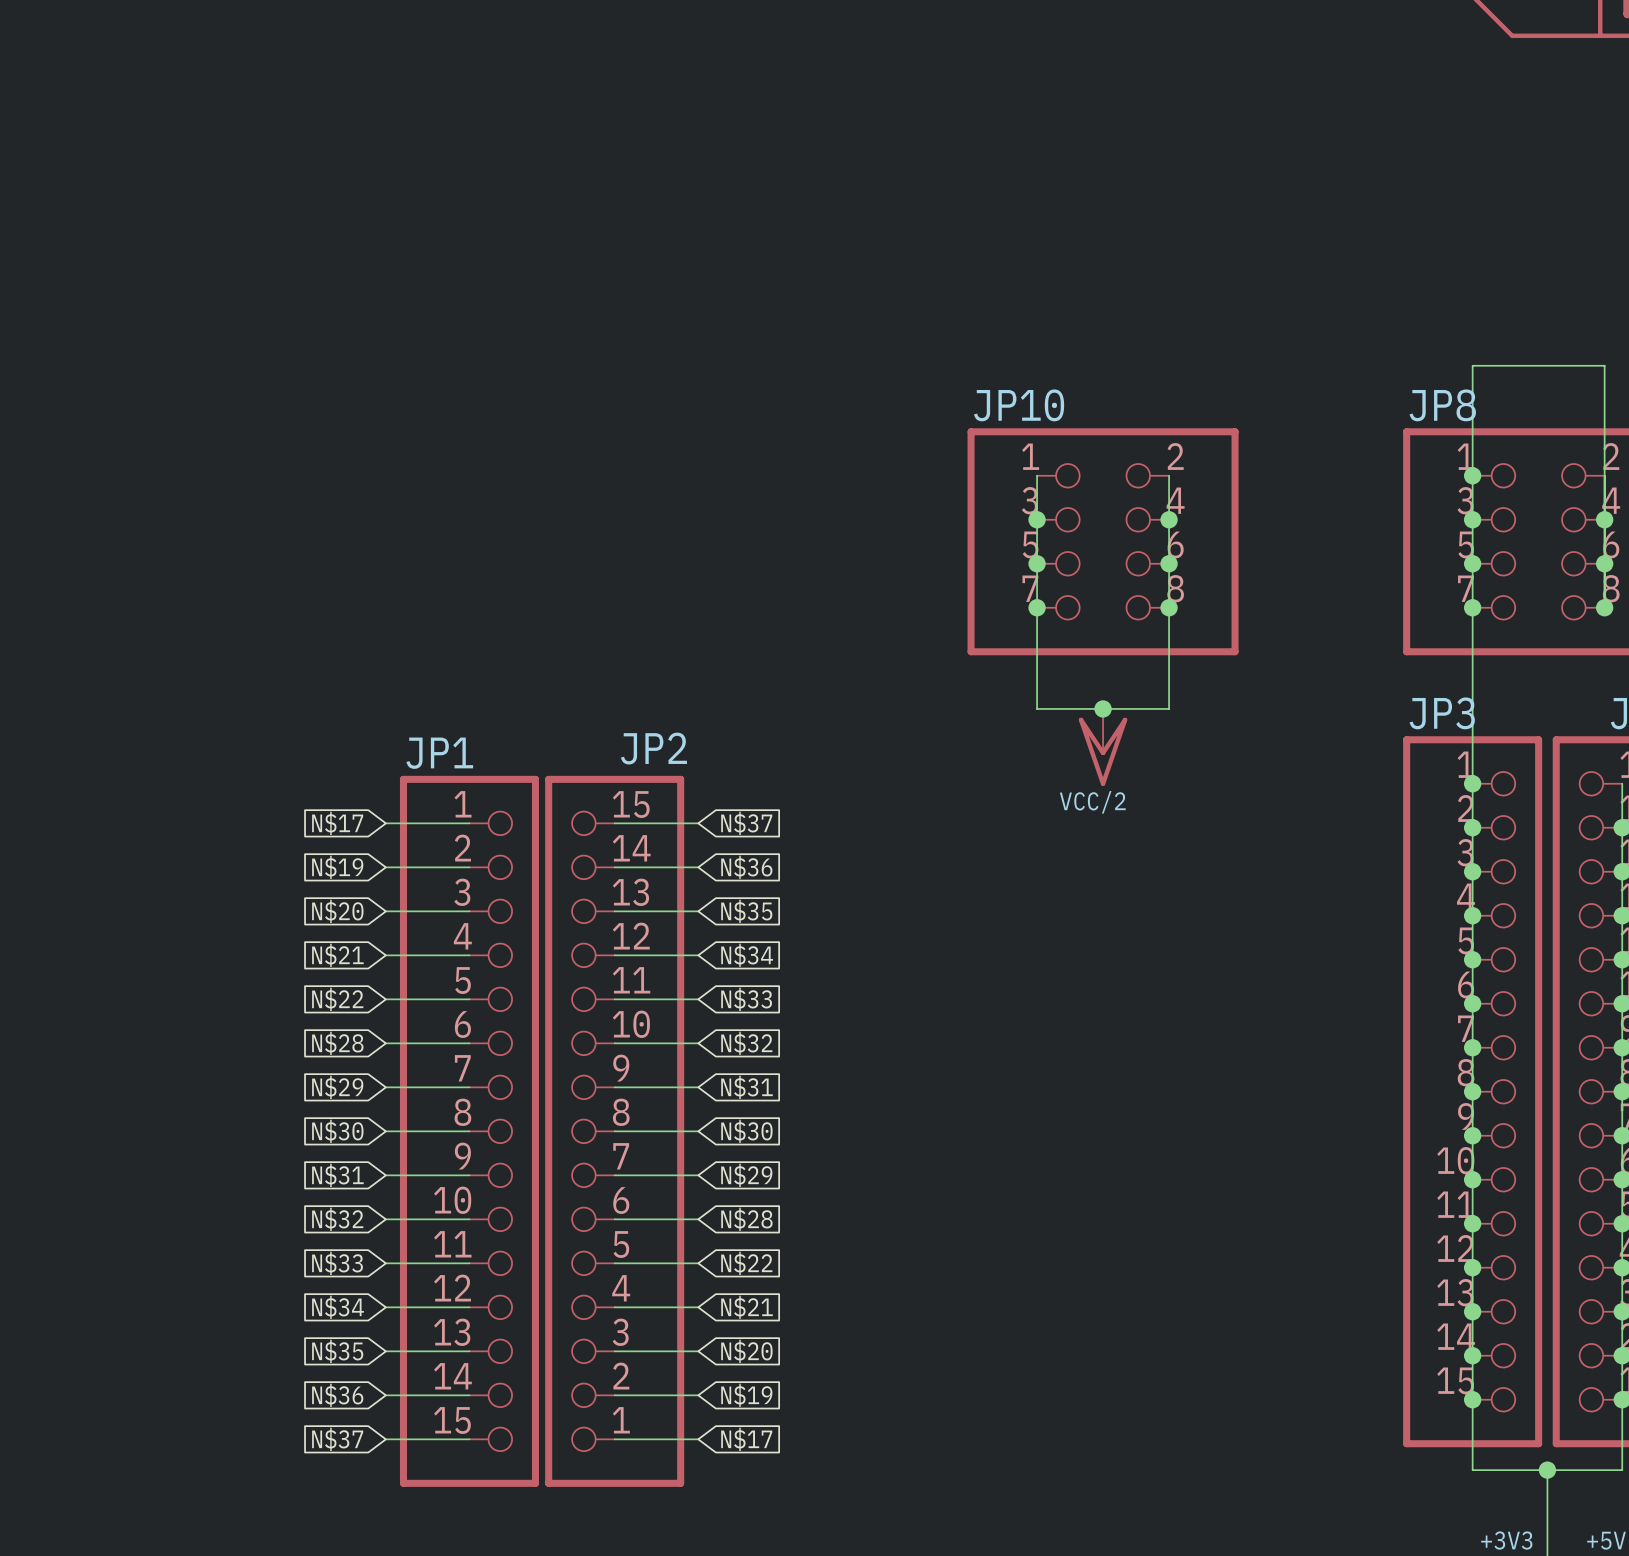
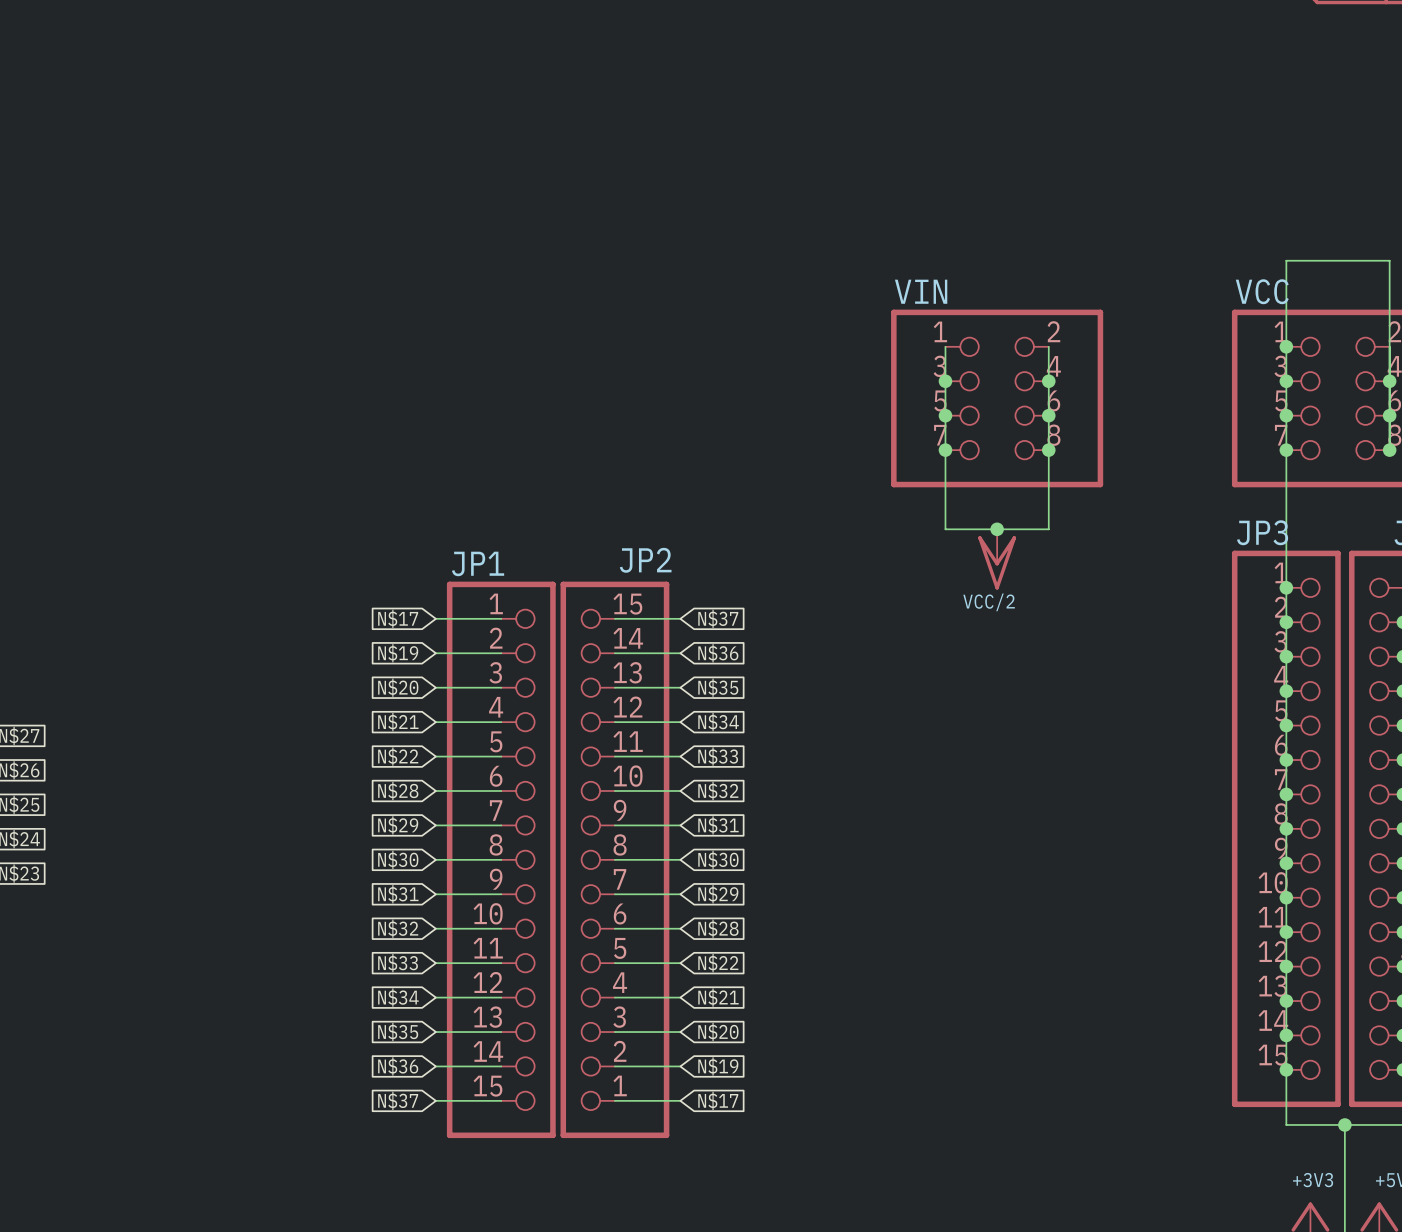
JP10 name: JP10 (1019, 405) -> VIN (921, 291)
JP8 name: JP8 (1442, 405) -> VCC (1262, 291)

